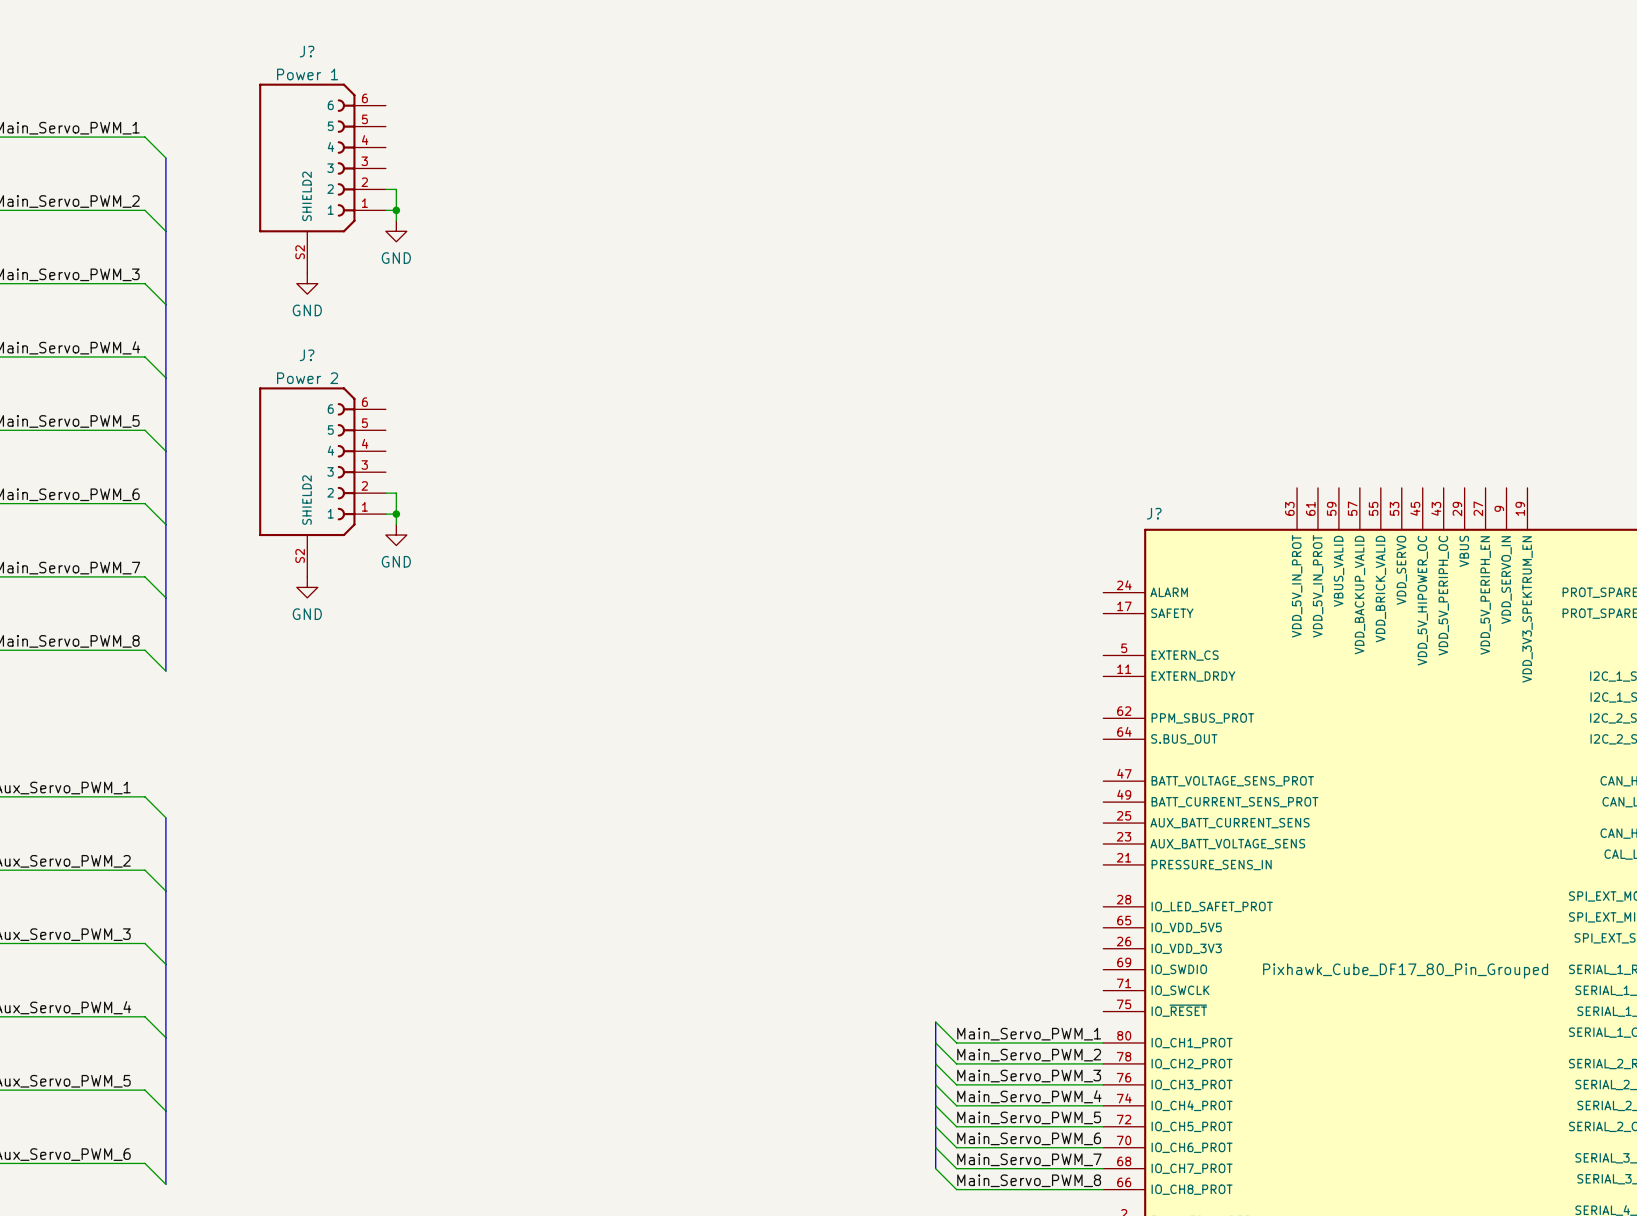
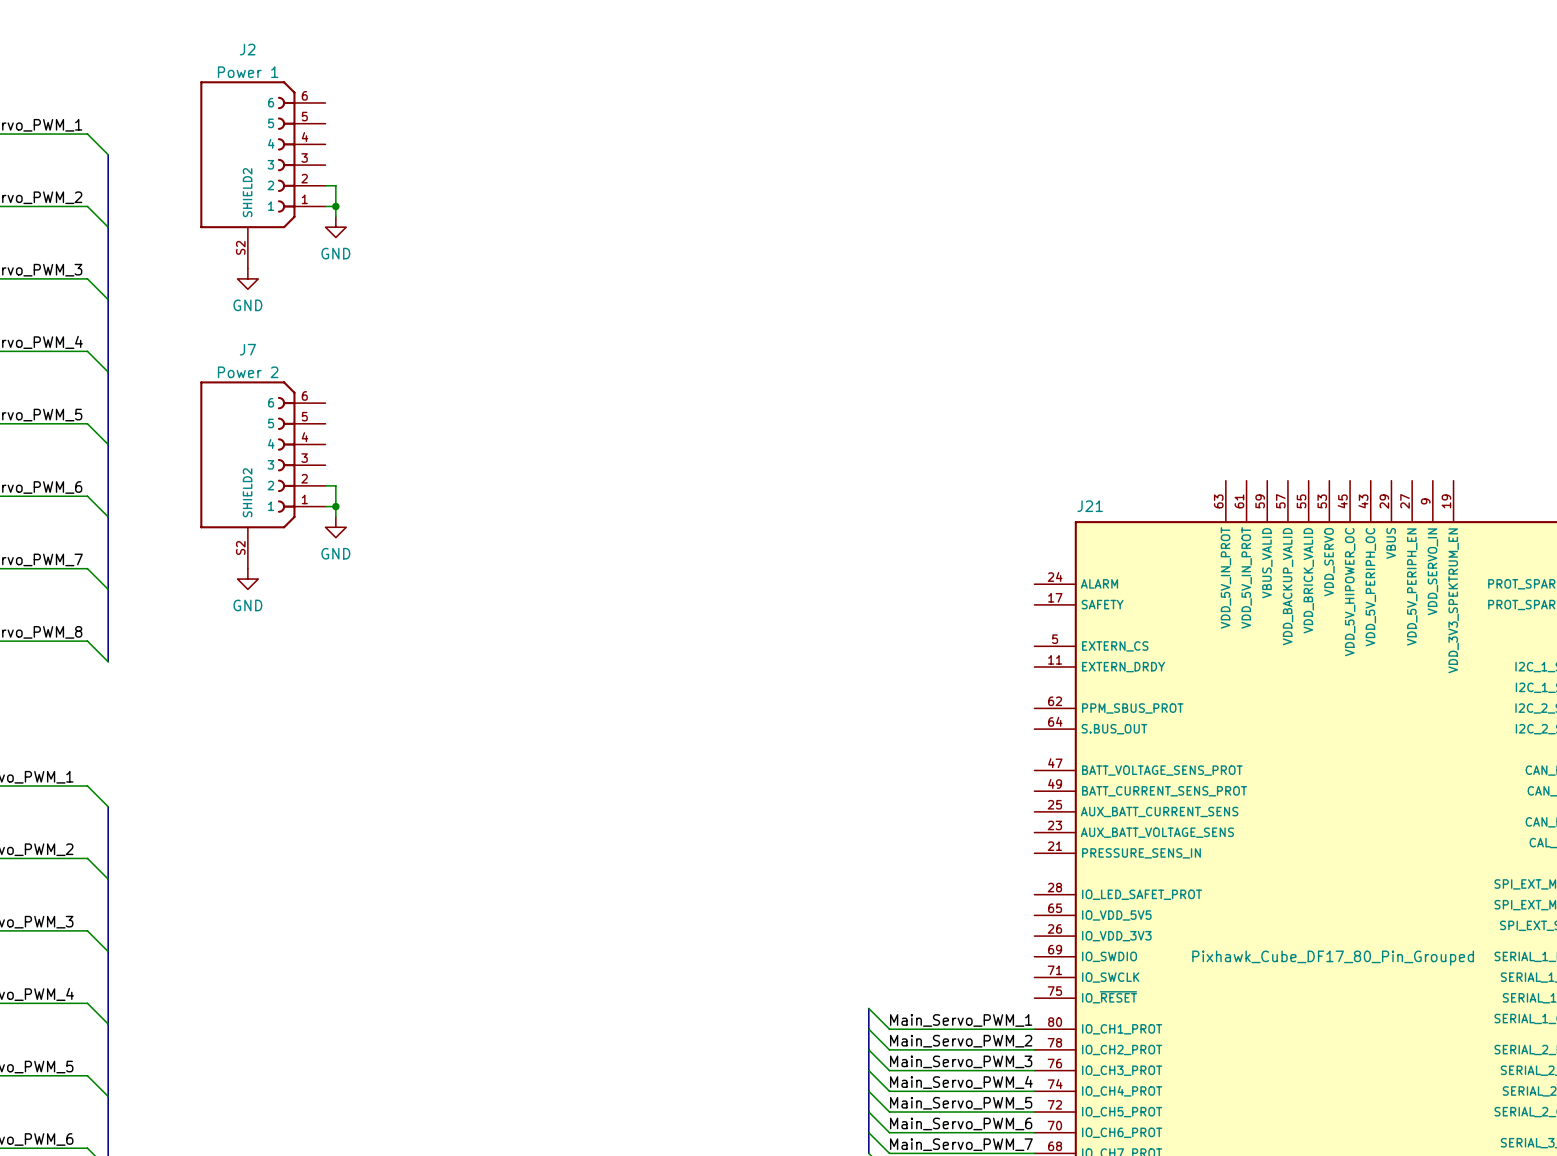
J? name: J? (307, 51) -> J2 (247, 49)
J? name: J? (307, 355) -> J7 (247, 349)
J? name: J? (1154, 513) -> J21 (1090, 506)

